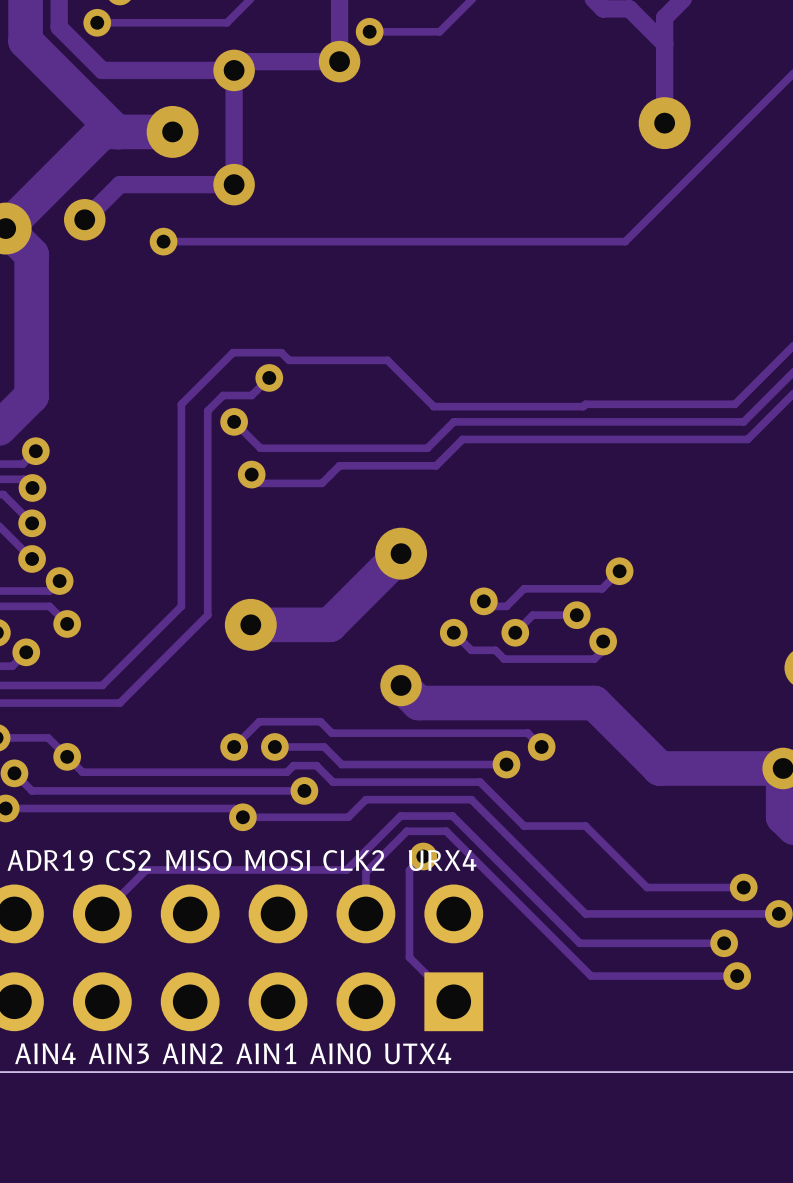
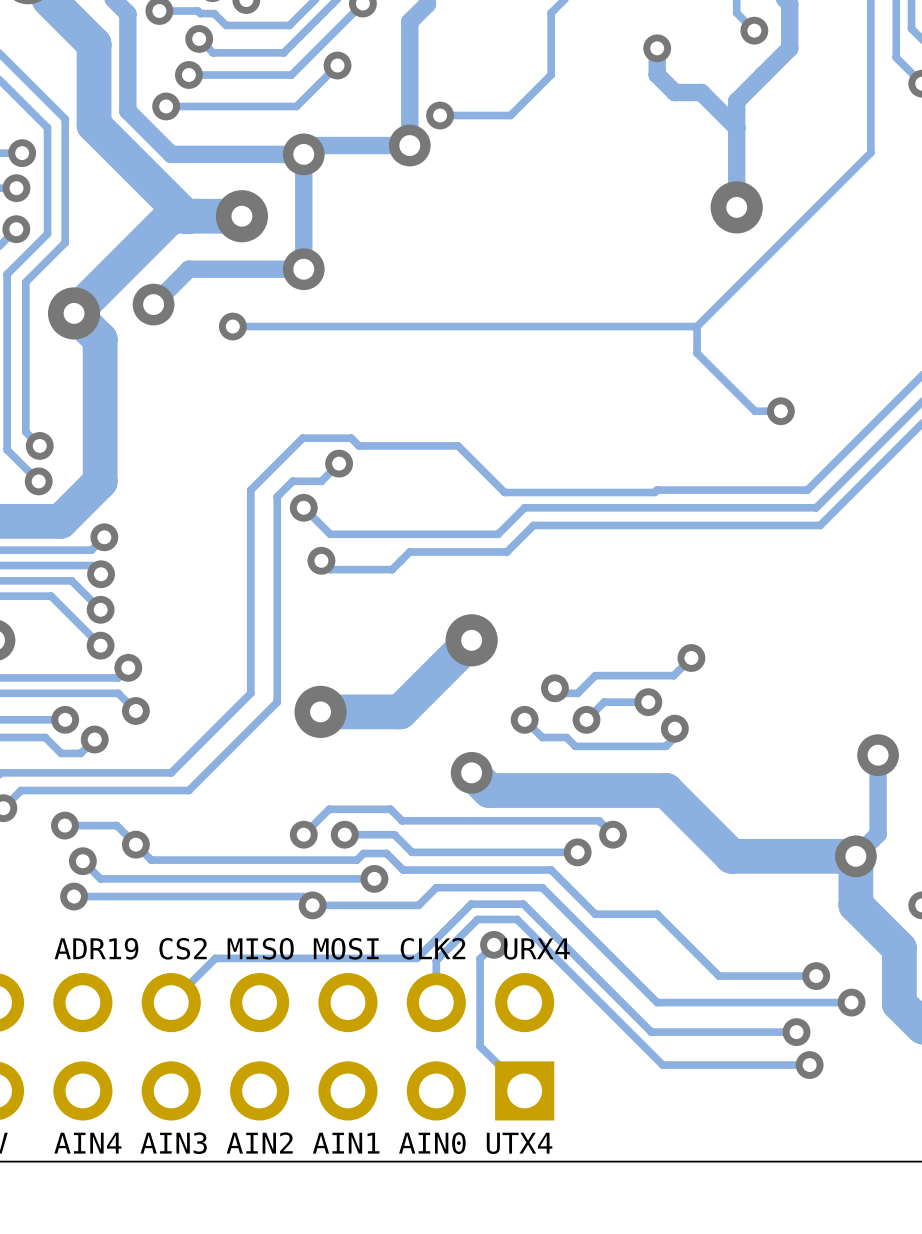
track: none -> (697, 326) (697, 353) (755, 411) (780, 411)
via: none -> (780, 411)

